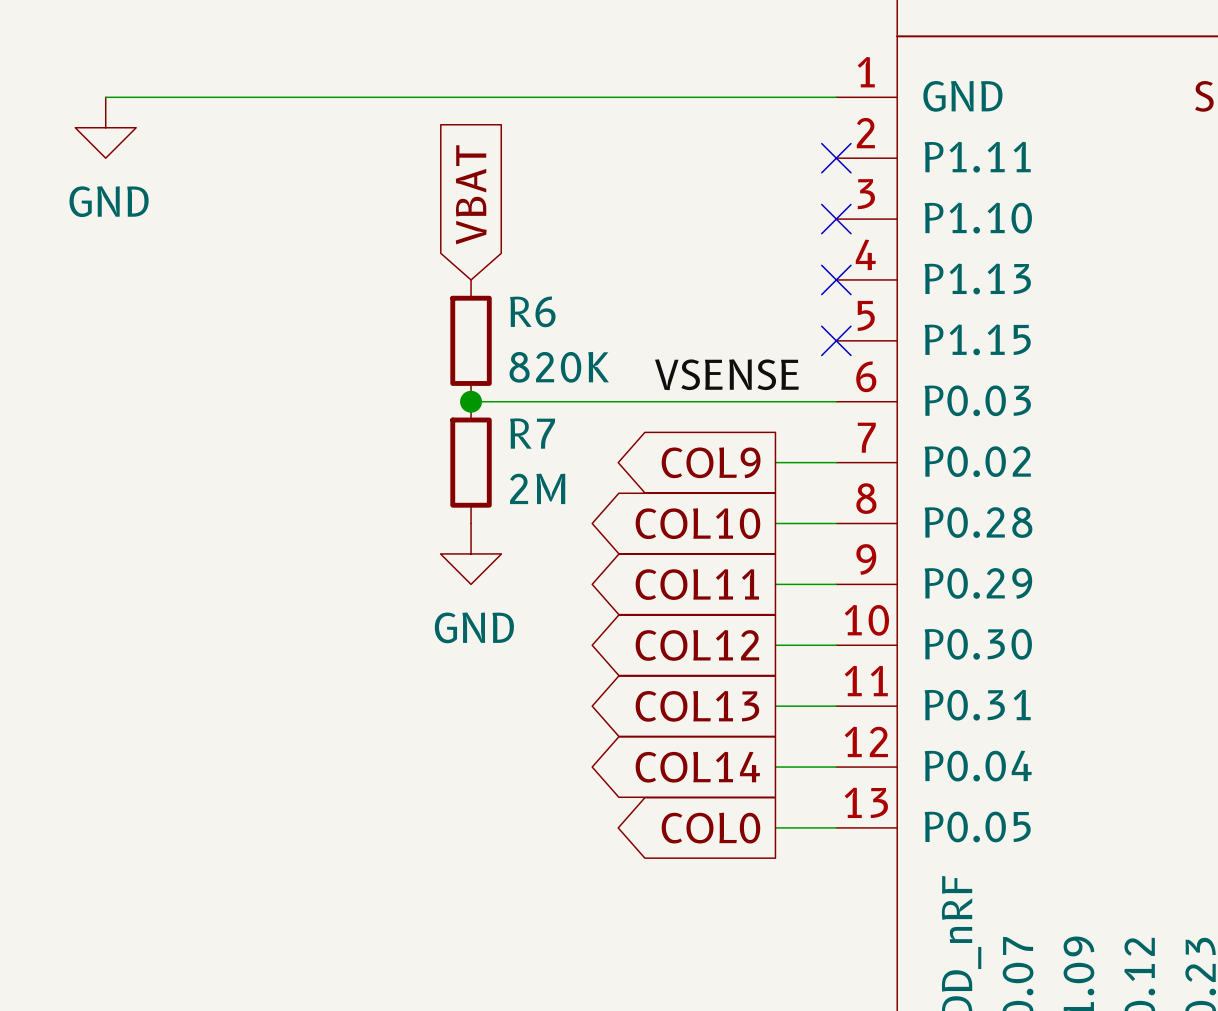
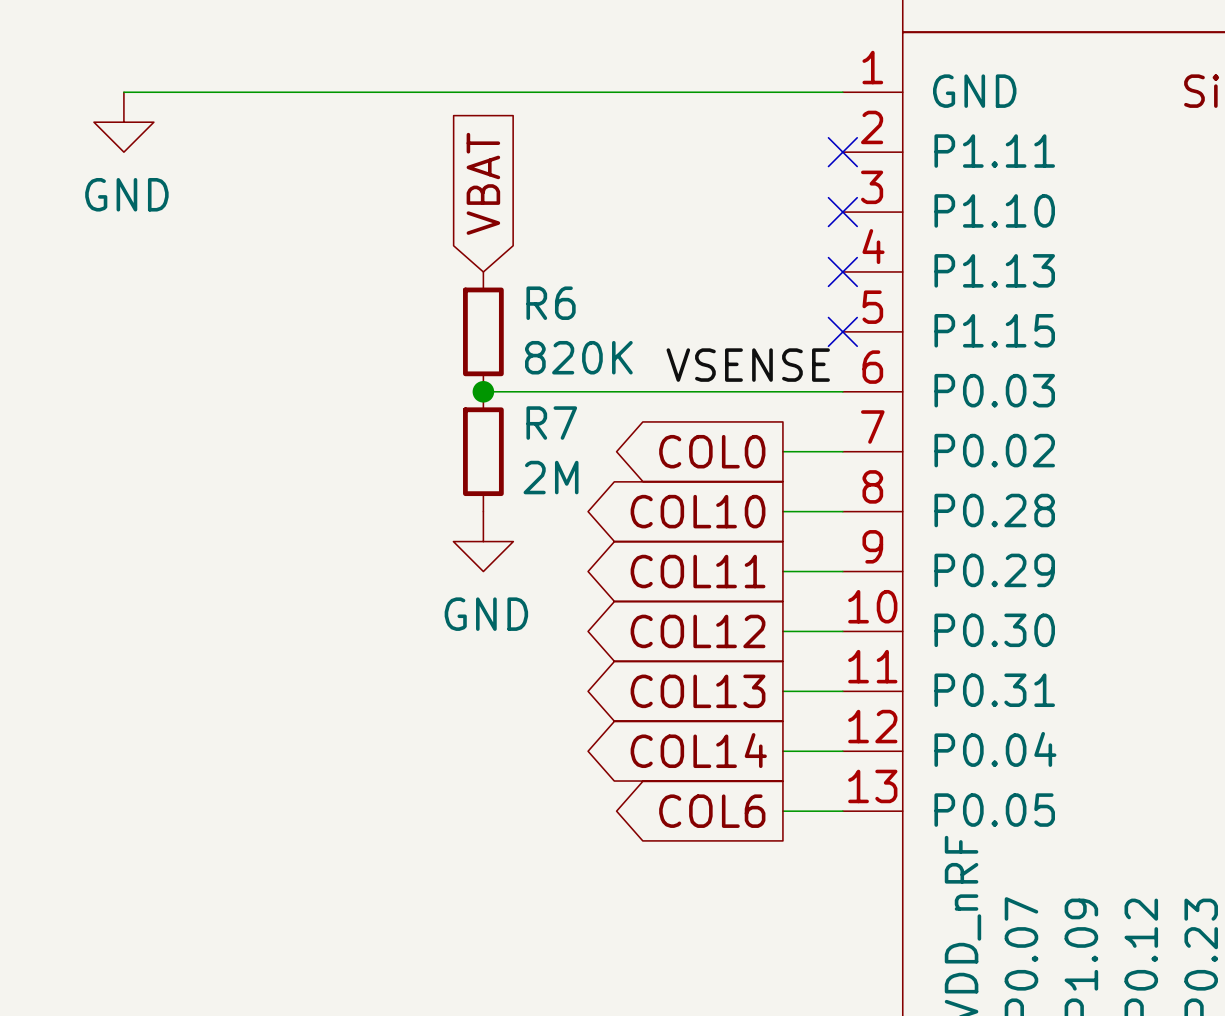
global label: COL9 (711, 462) -> COL0 (712, 451)
global label: COL0 (710, 828) -> COL6 (712, 811)

